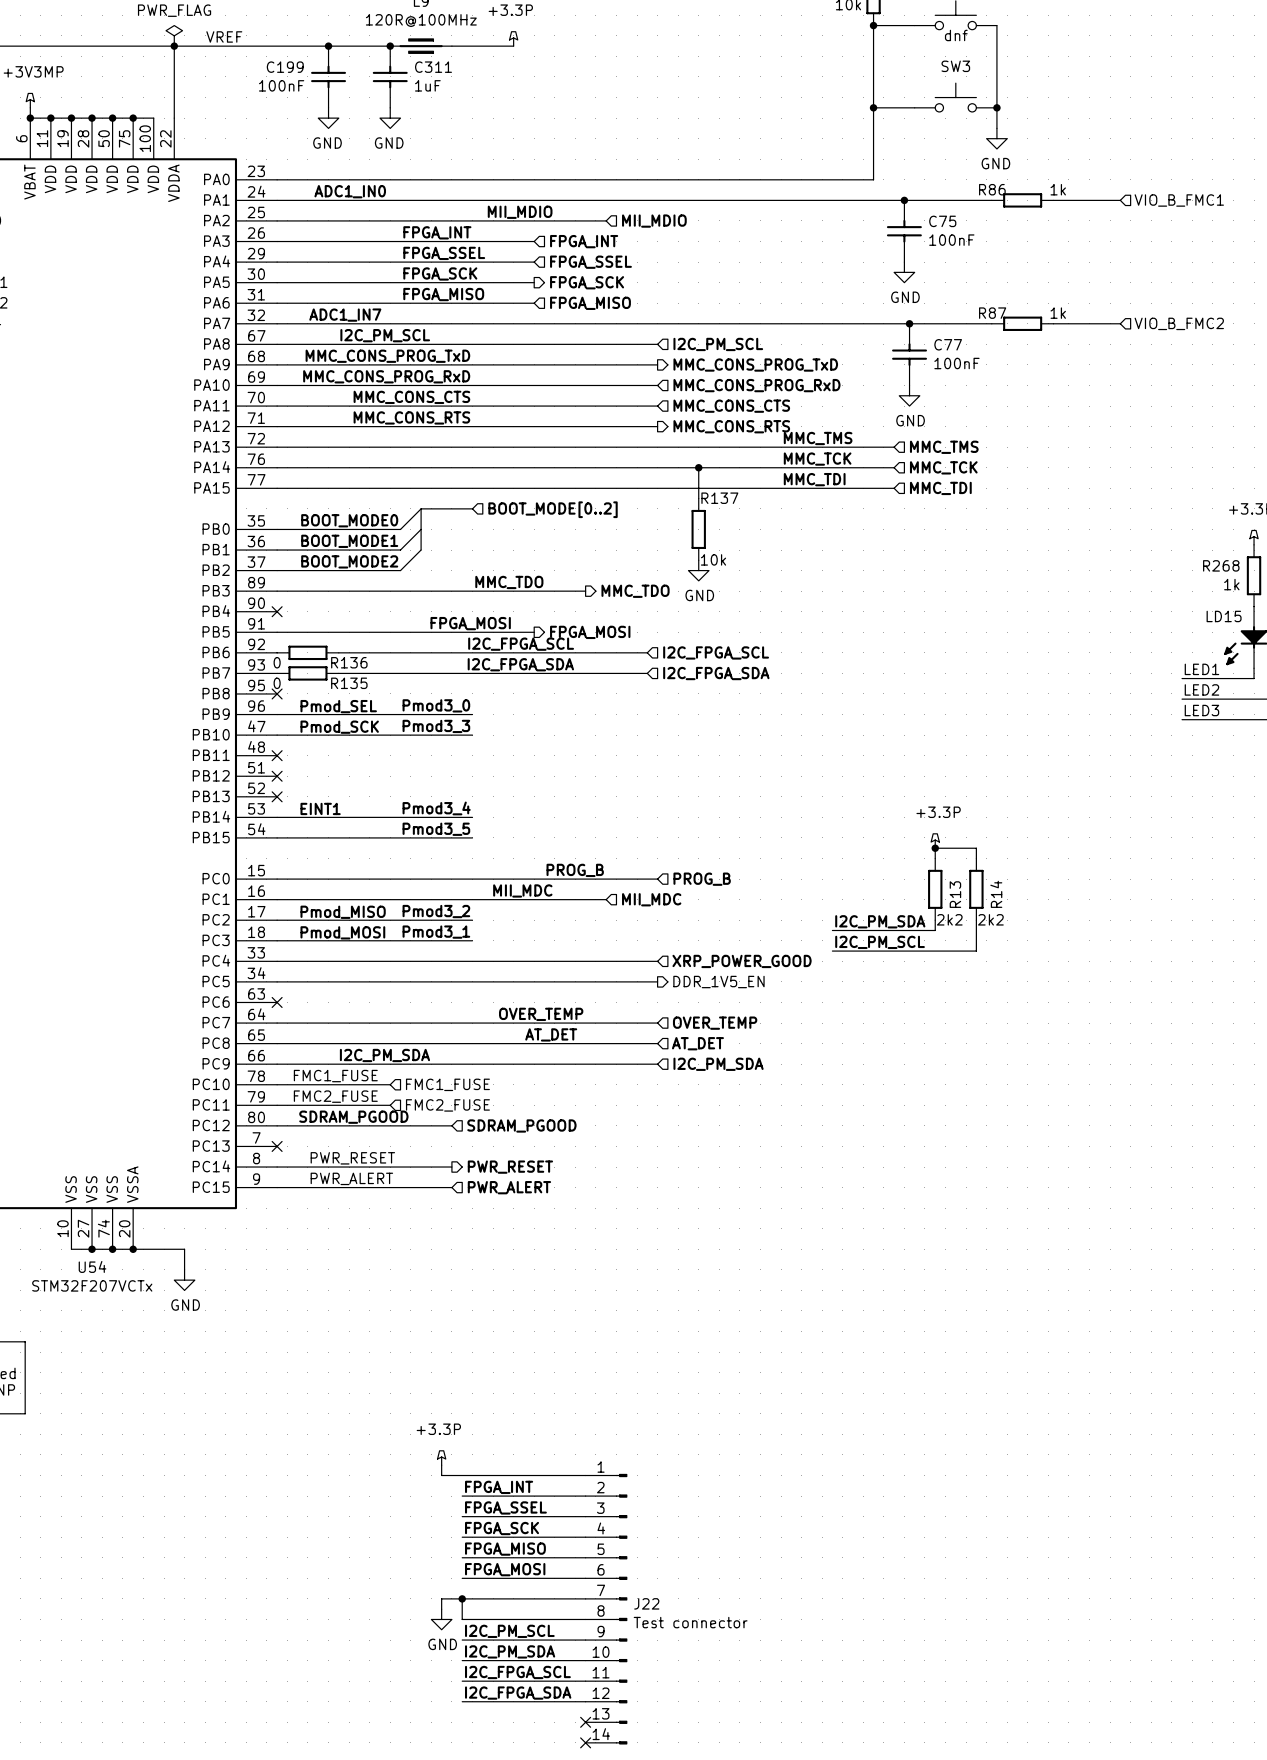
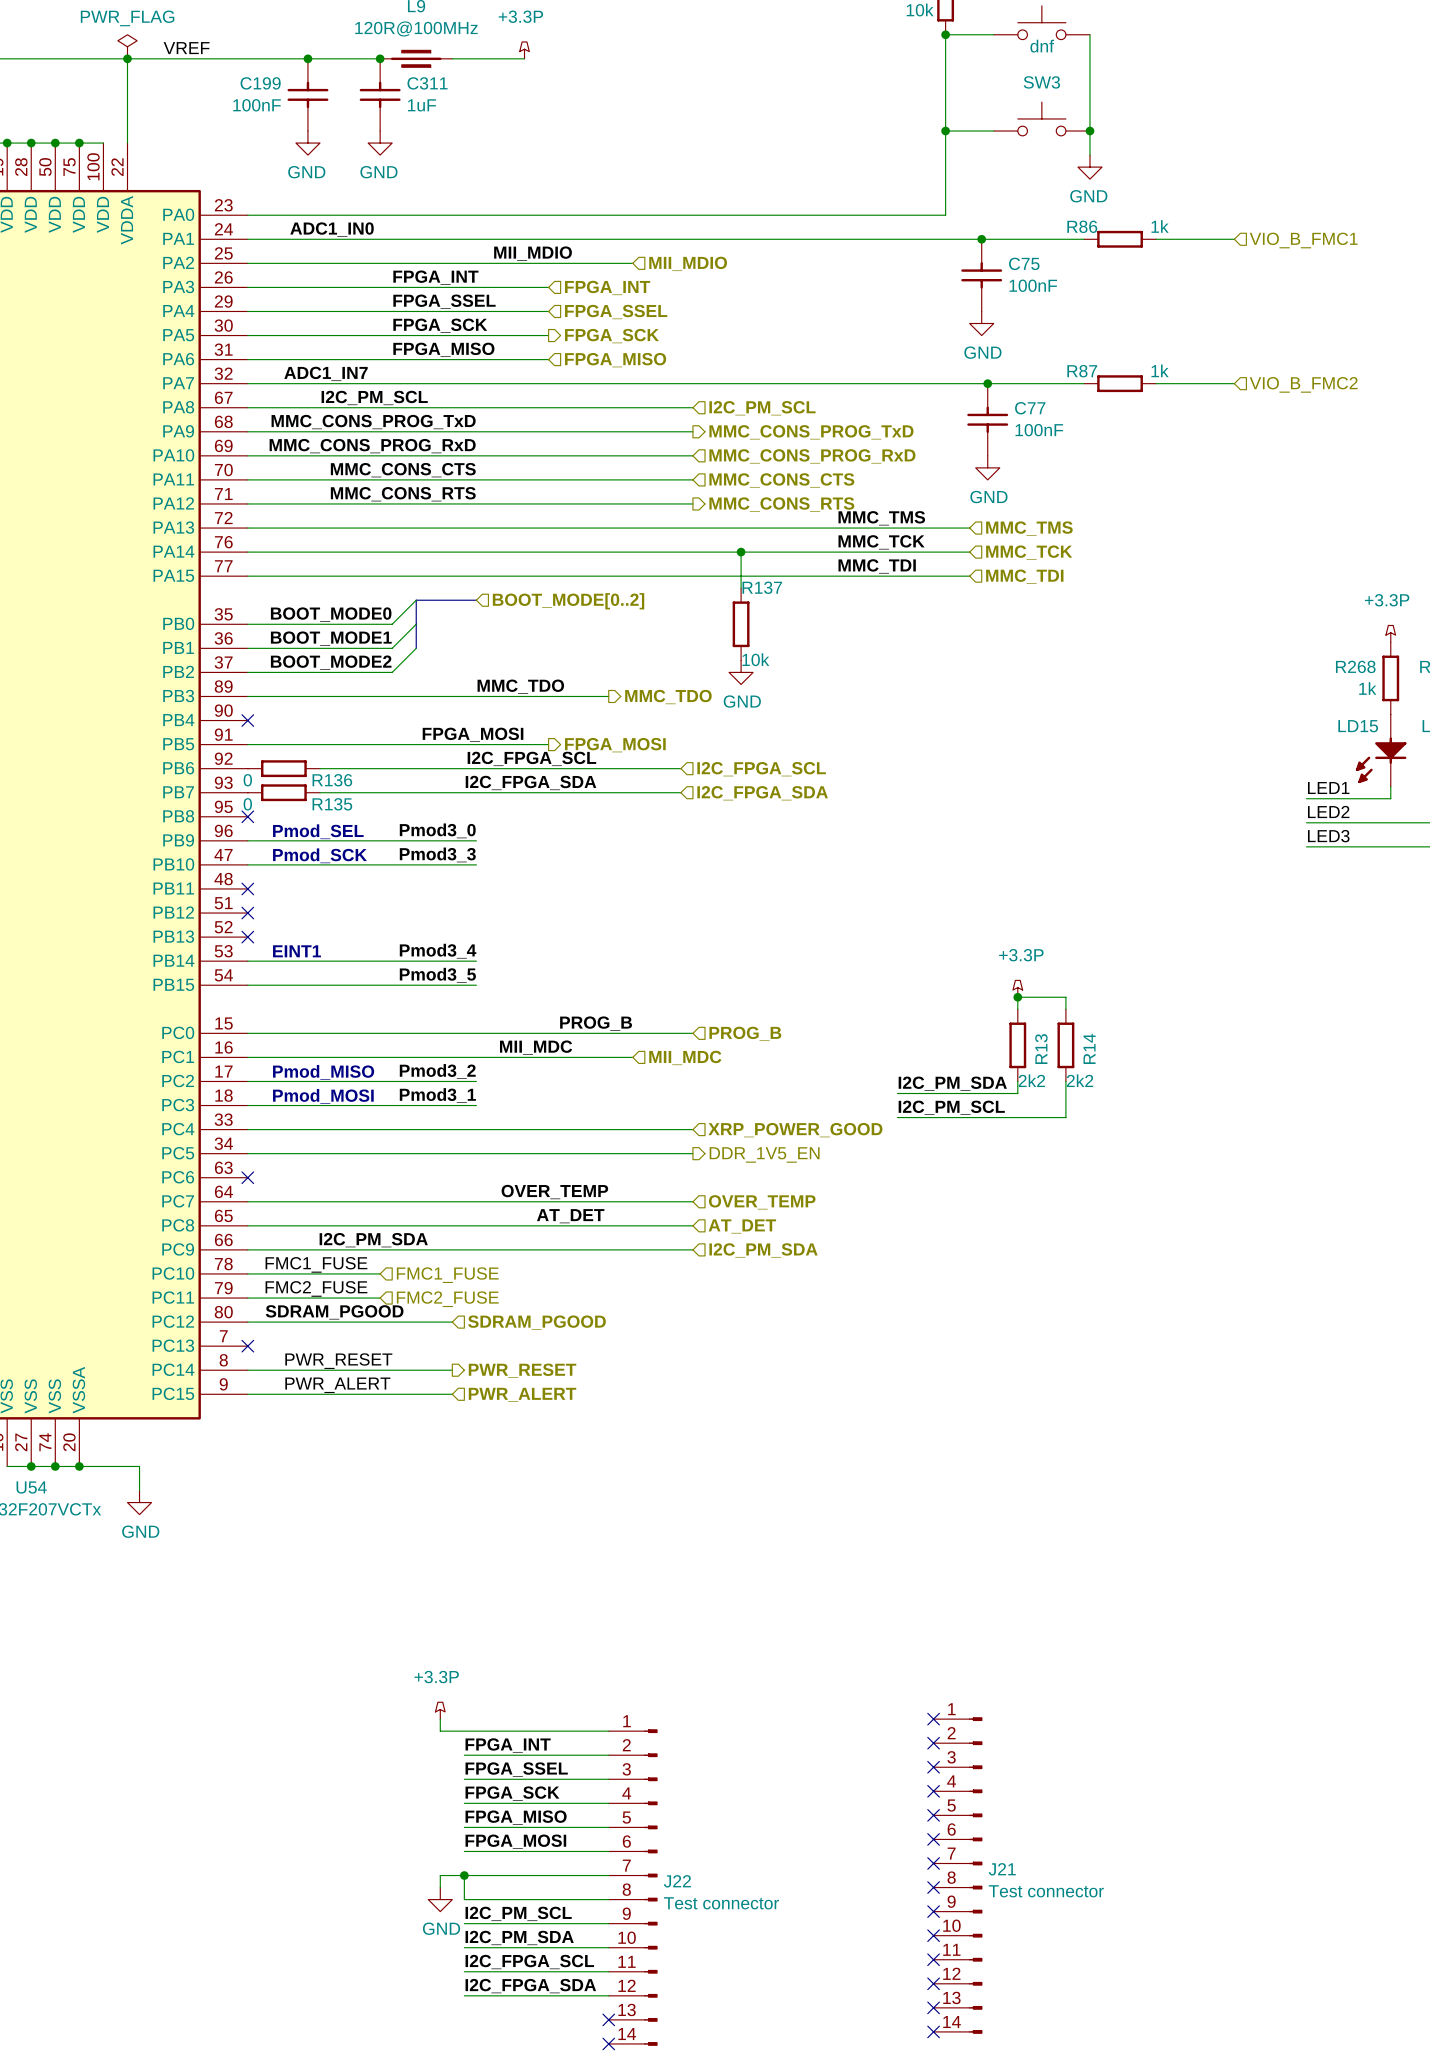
no-connect mark: none -> (933, 1719)
no-connect mark: none -> (933, 1743)
no-connect mark: none -> (933, 1767)
no-connect mark: none -> (933, 1791)
no-connect mark: none -> (933, 1815)
no-connect mark: none -> (933, 1839)
no-connect mark: none -> (933, 1863)
J21: none -> Test connector (958, 1875)
no-connect mark: none -> (933, 1887)
no-connect mark: none -> (933, 1911)
no-connect mark: none -> (933, 1935)
no-connect mark: none -> (933, 1959)
no-connect mark: none -> (933, 1983)
no-connect mark: none -> (933, 2007)
no-connect mark: none -> (933, 2031)

